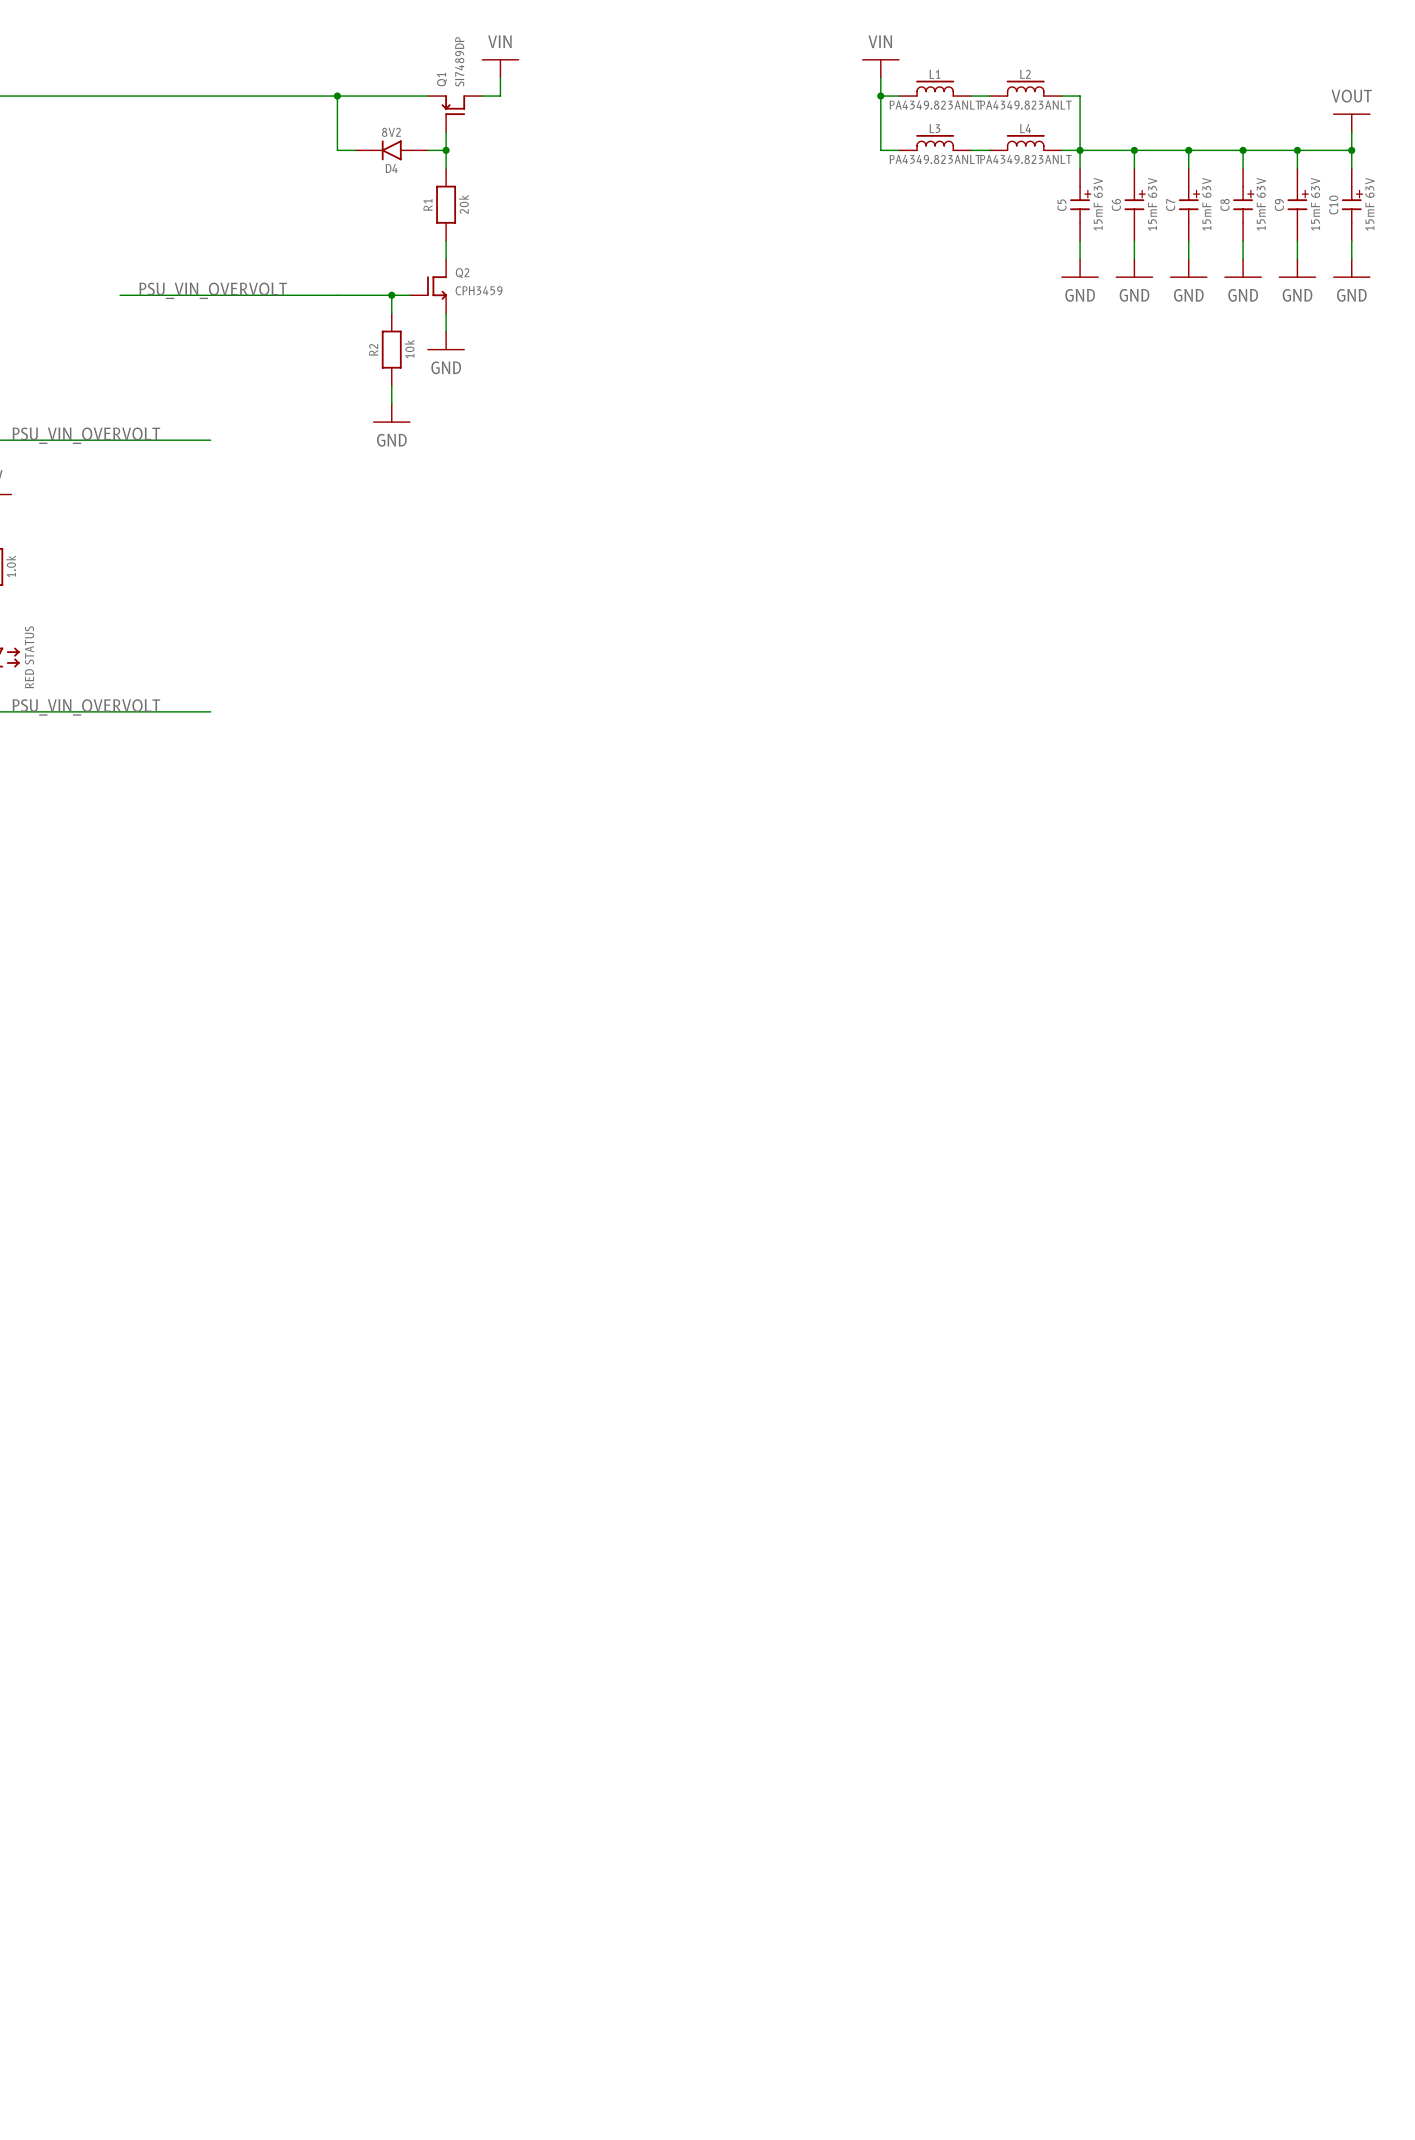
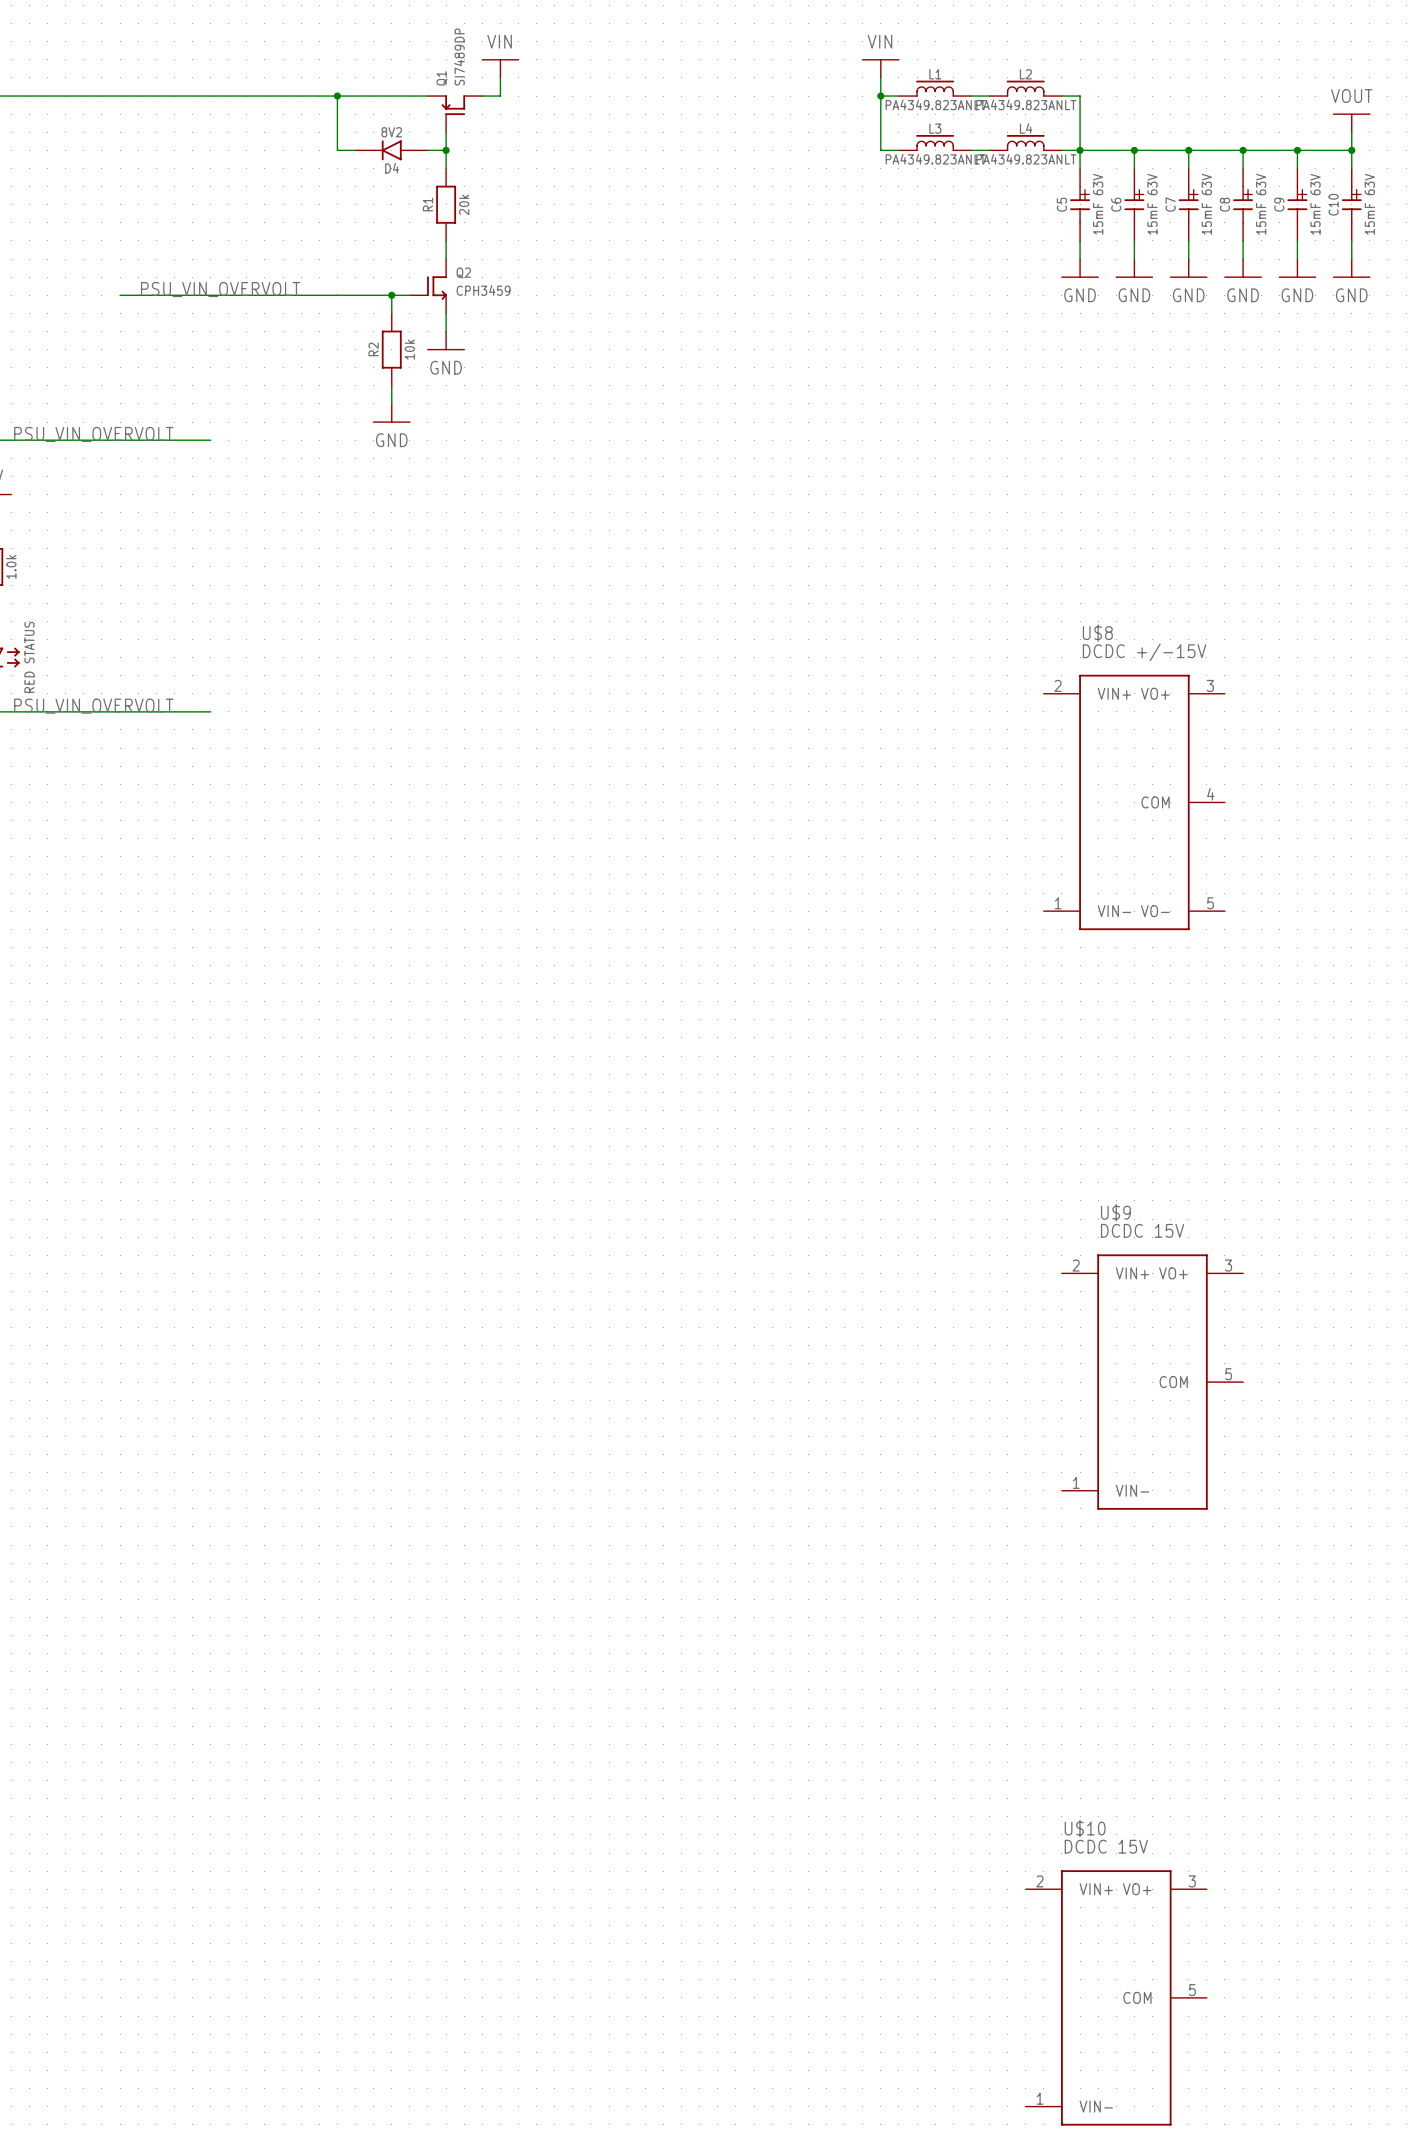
U$8: none -> DCDC +/-15V (1134, 802)
U$9: none -> DCDC 15V (1152, 1382)
U$10: none -> DCDC 15V (1116, 1997)

